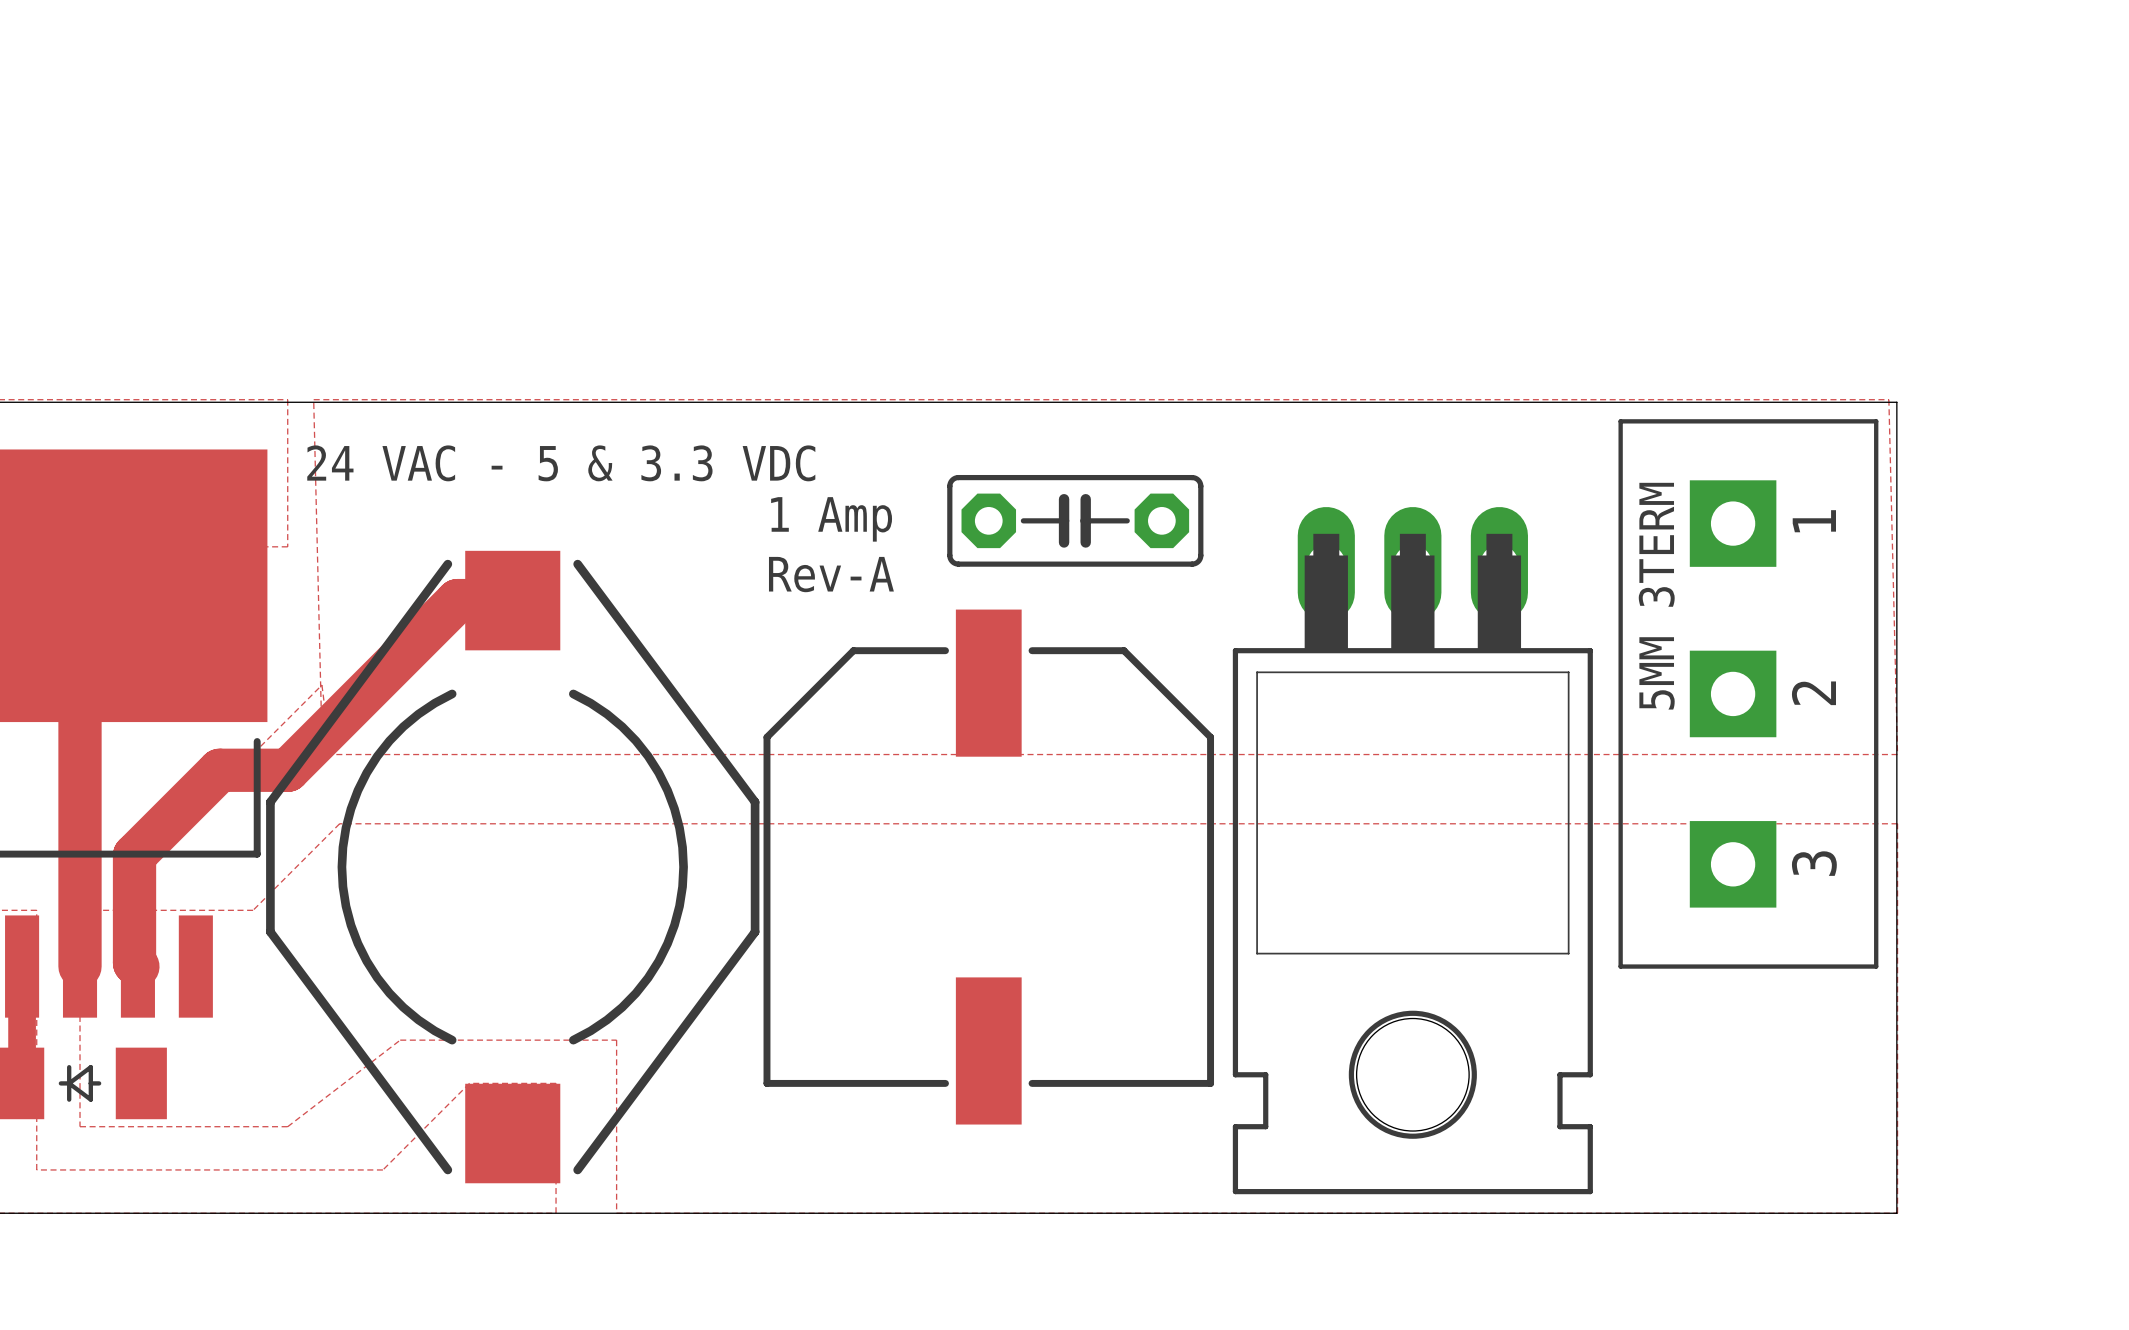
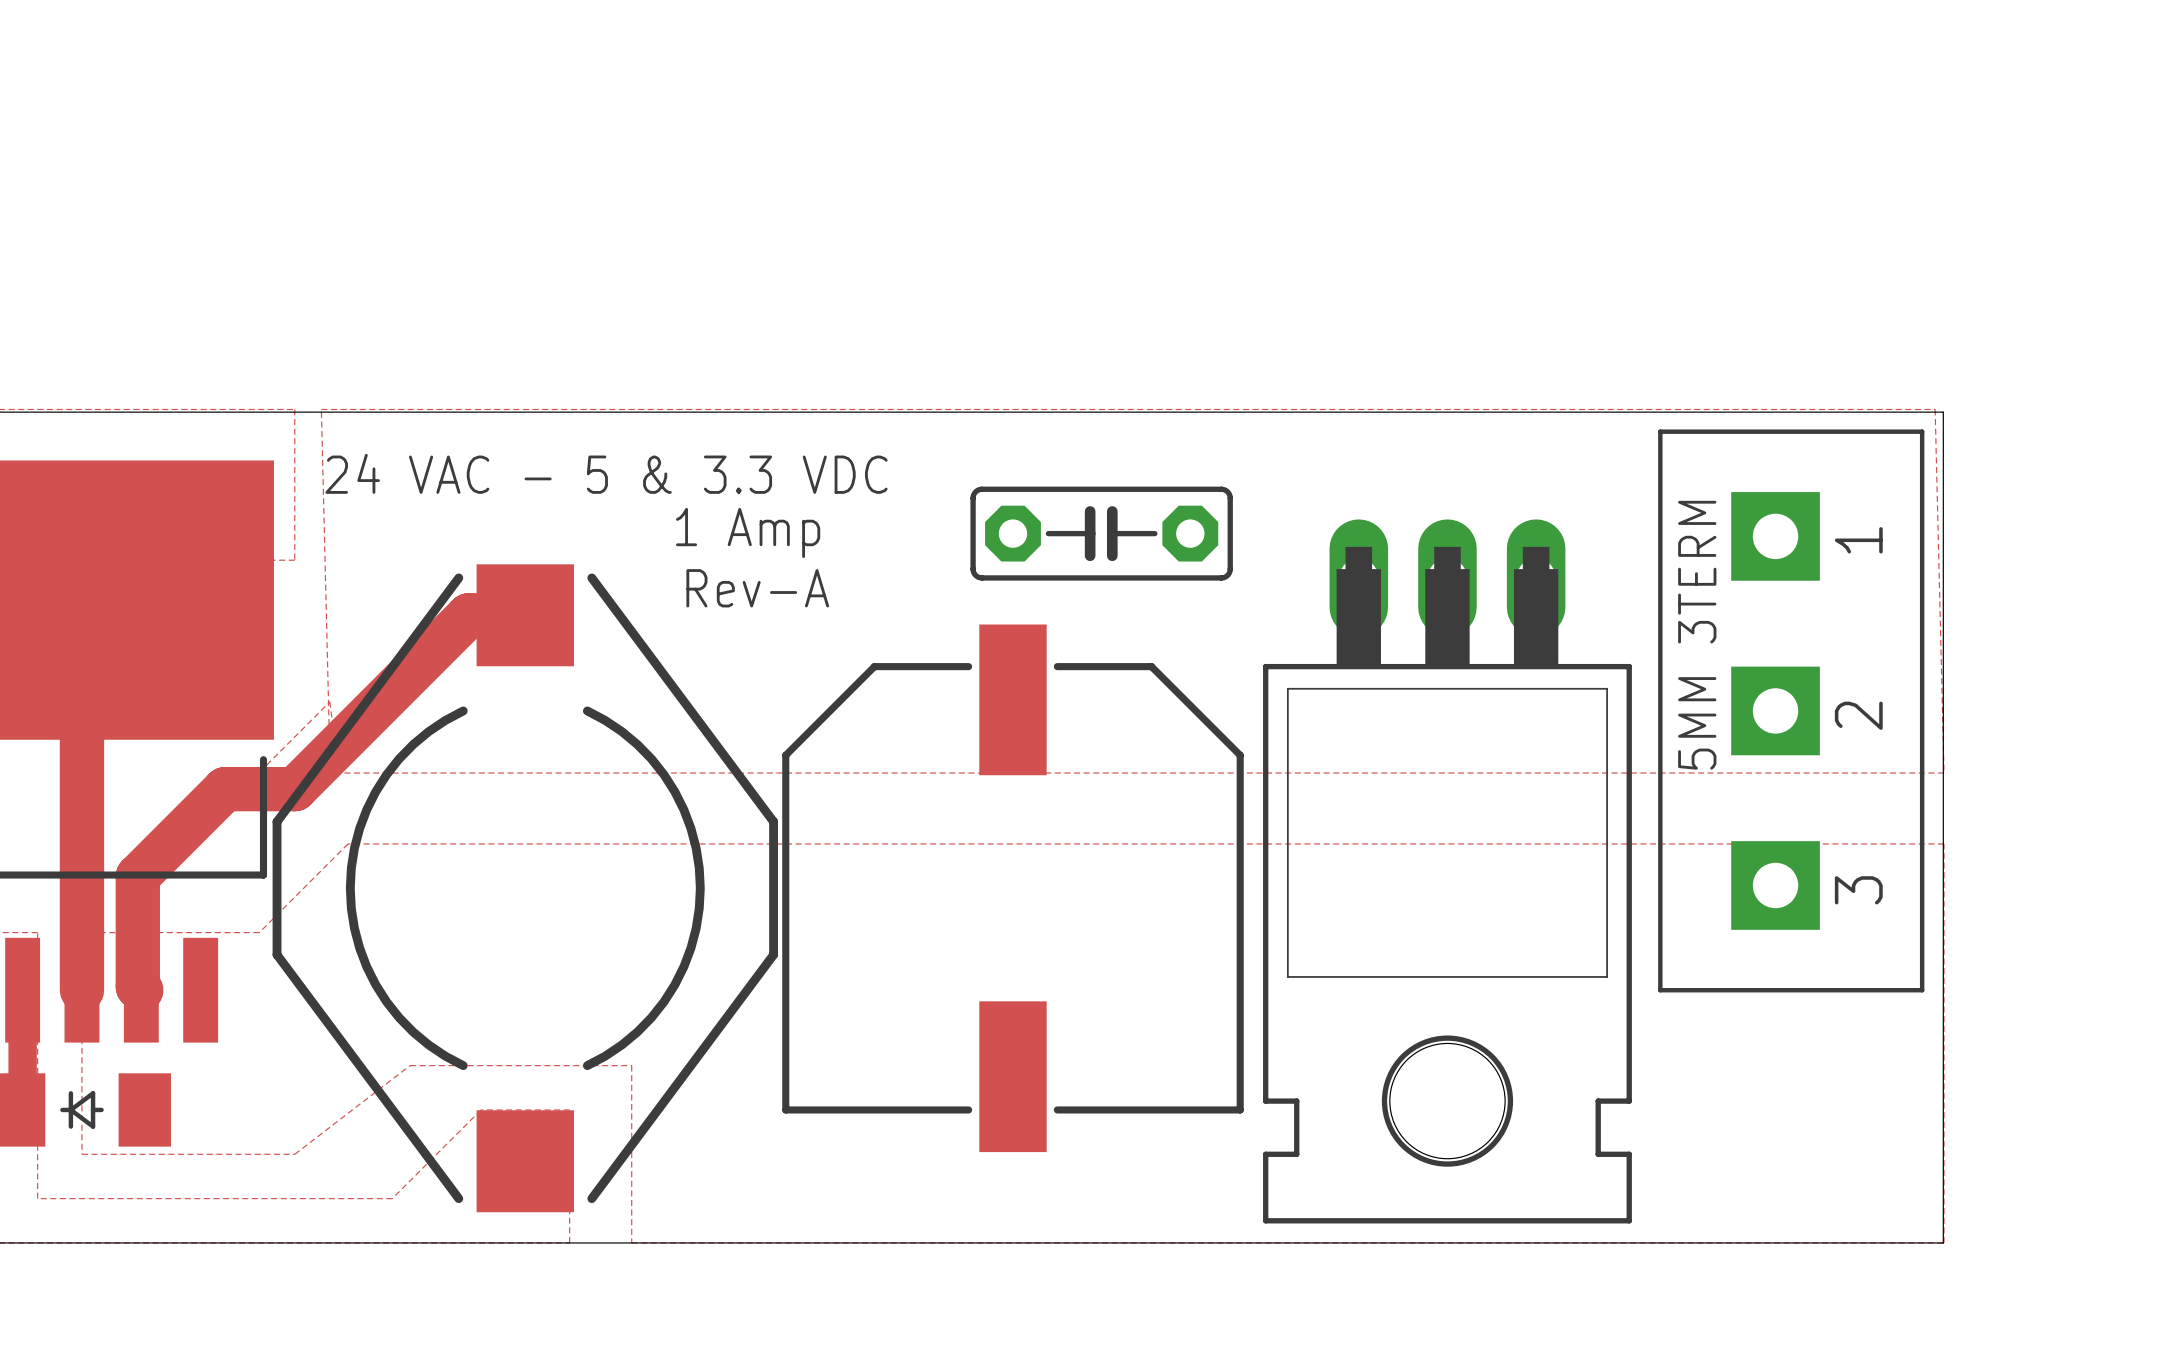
text position: 24 VAC - 5 & 3.3 VDC (561, 463) -> 24 VAC - 5 & 3.3 VDC (606, 473)
text position: 1 Amp (831, 519) -> 1 Amp (748, 532)
text position: Rev-A (831, 574) -> Rev-A (757, 588)

